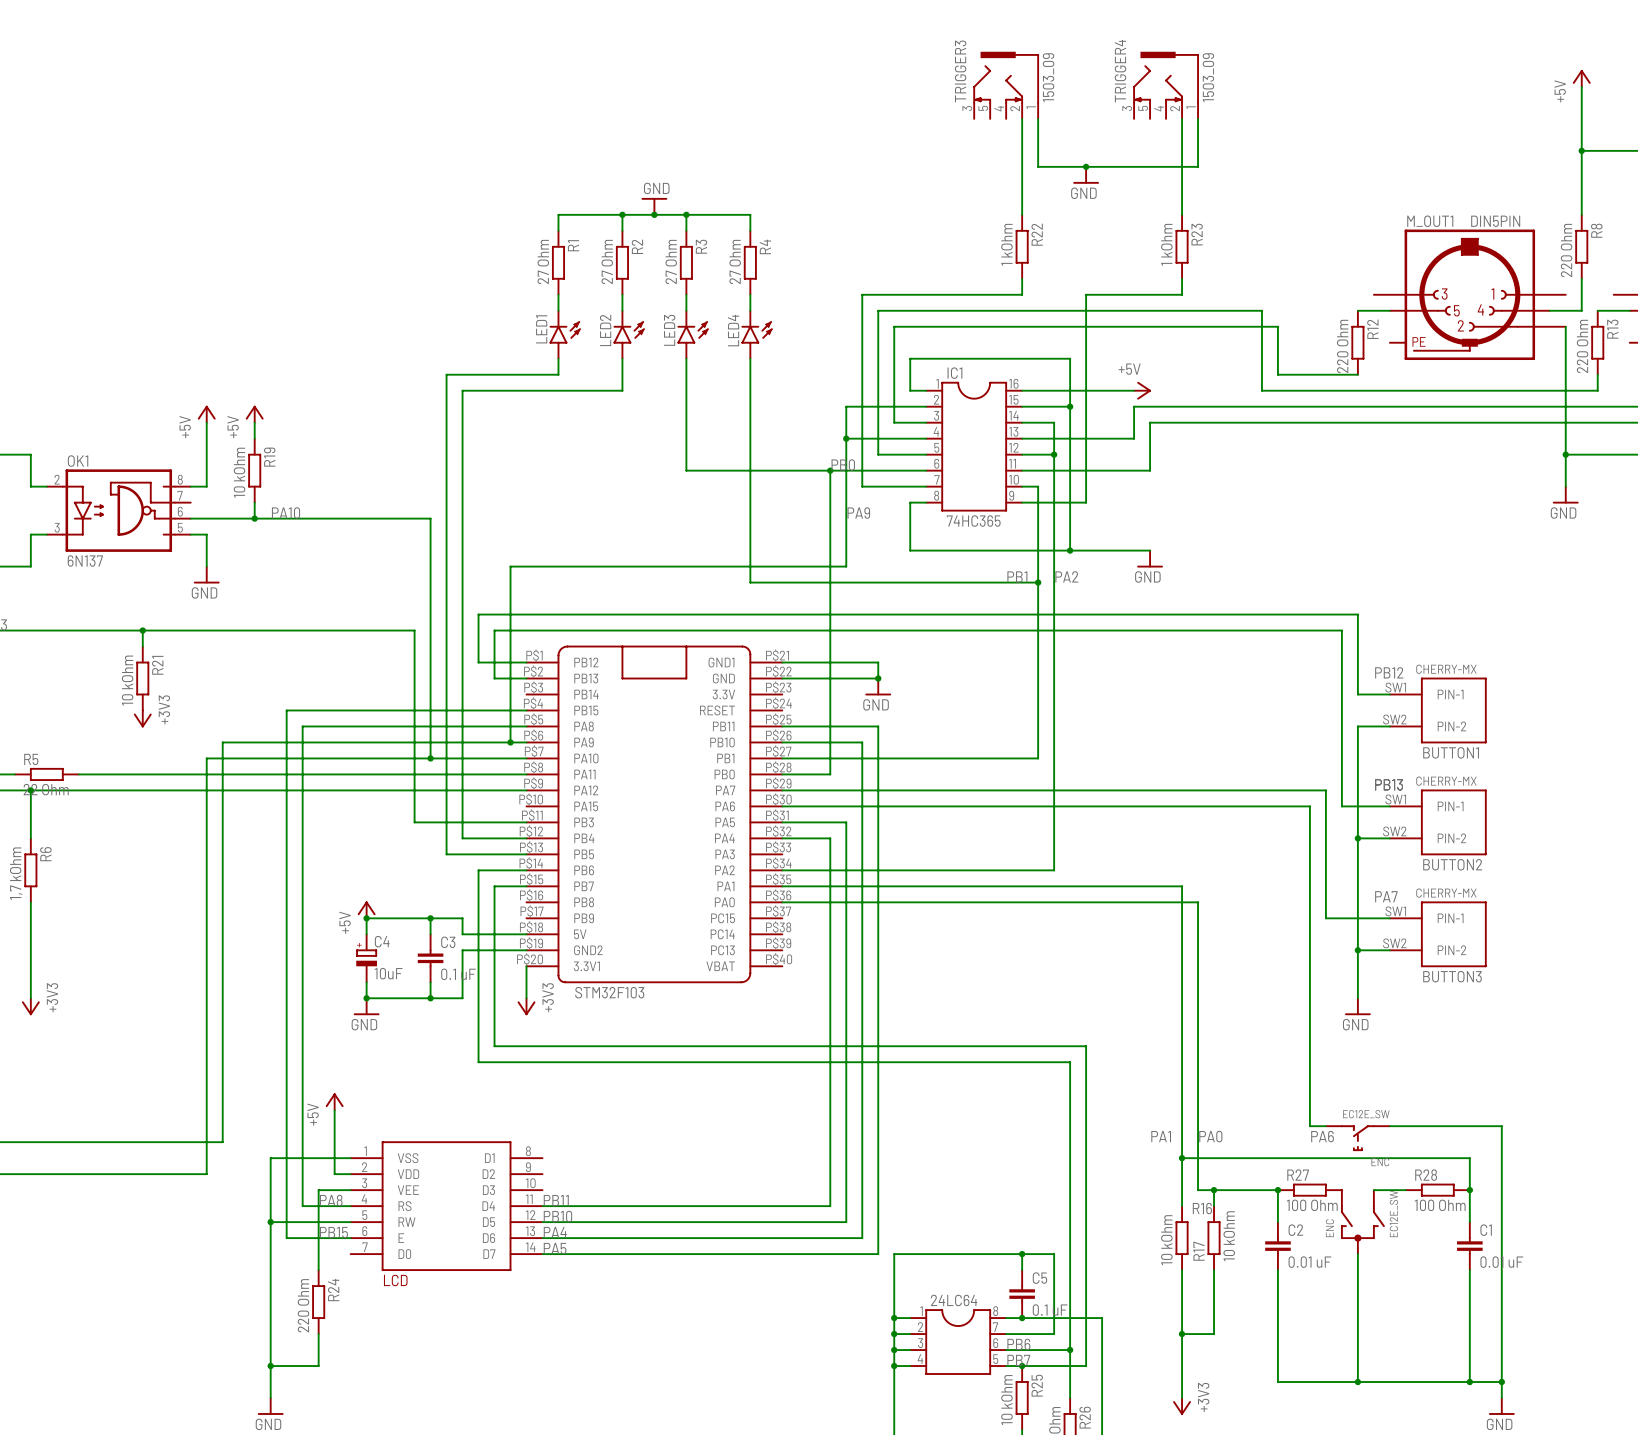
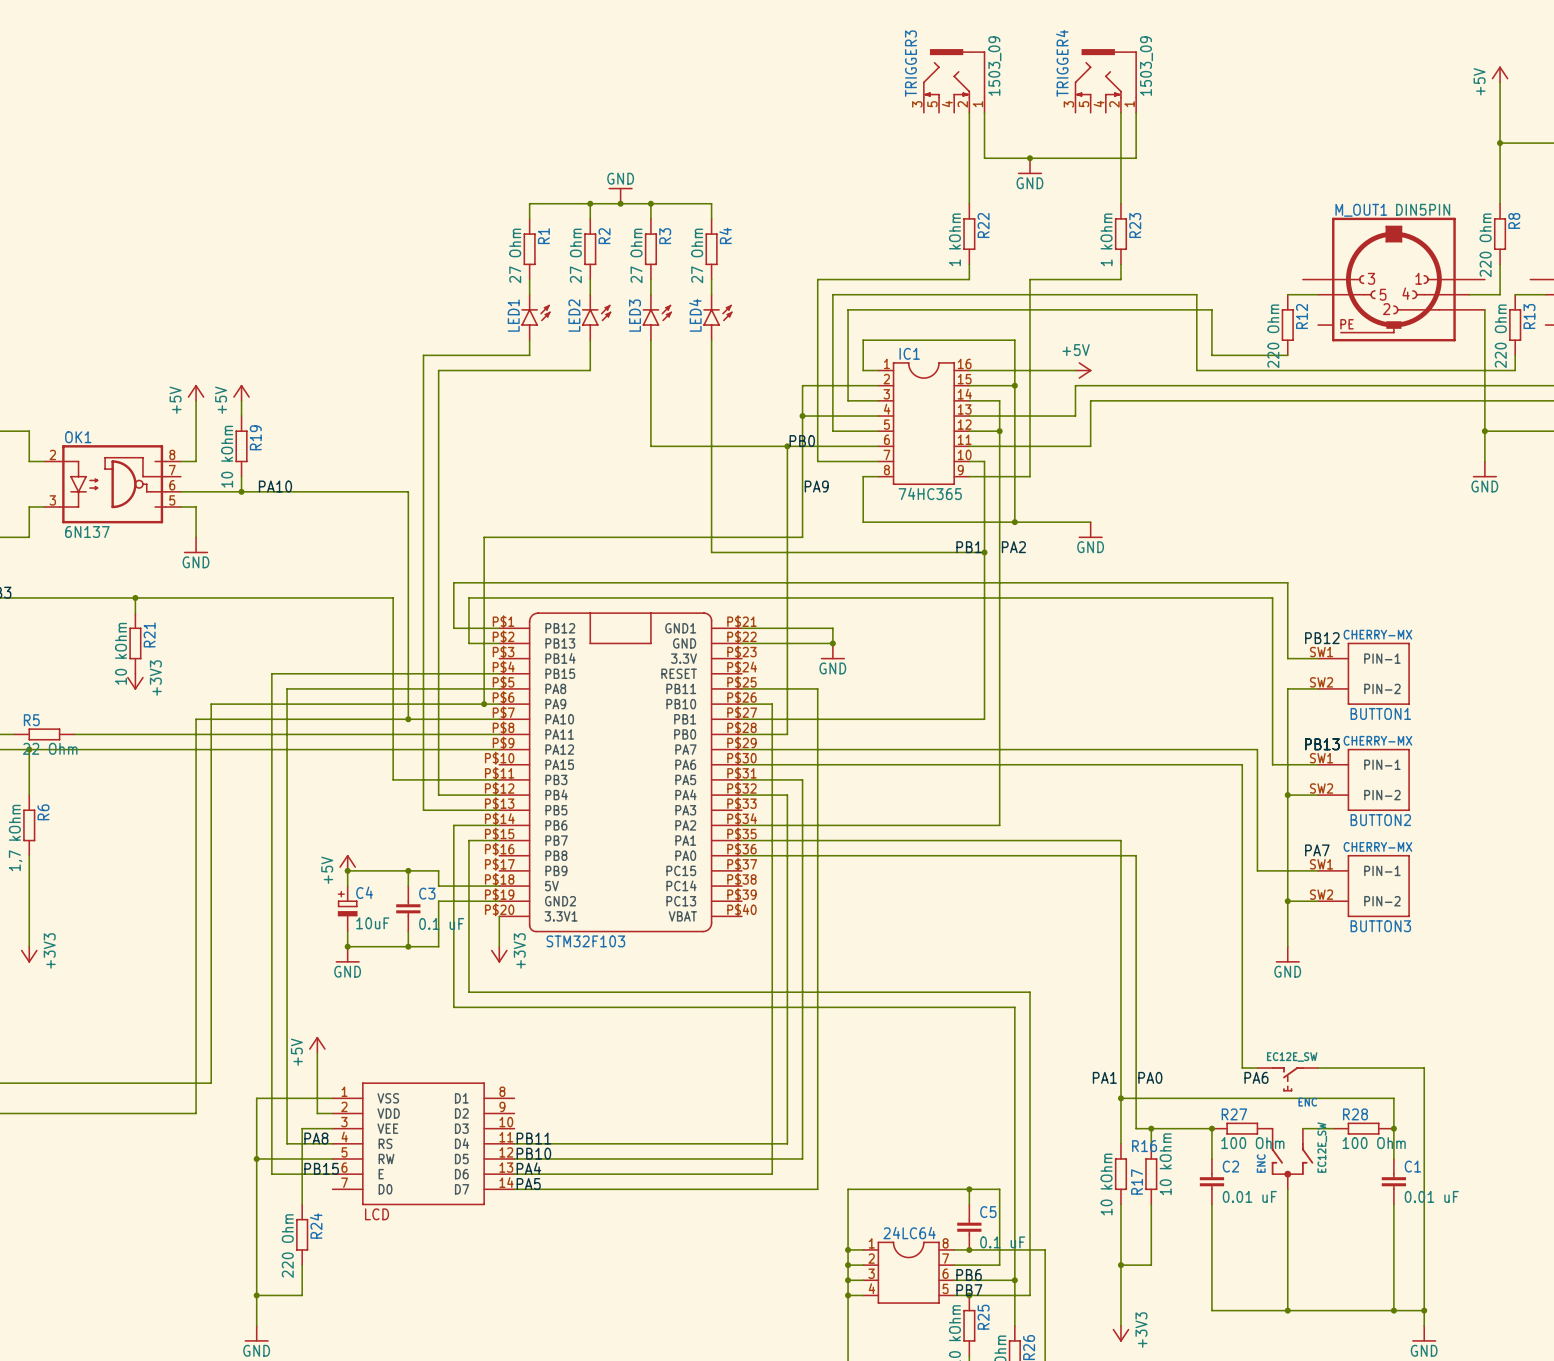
wire: (862, 726) (878, 726) (878, 1254) (862, 1254) -> none
wire: (814, 742) (862, 742) -> (817, 688) (817, 704)
wire: none -> (772, 704) (772, 1174)
wire: (814, 1238) (862, 1238) -> (817, 1189) (817, 1174)

